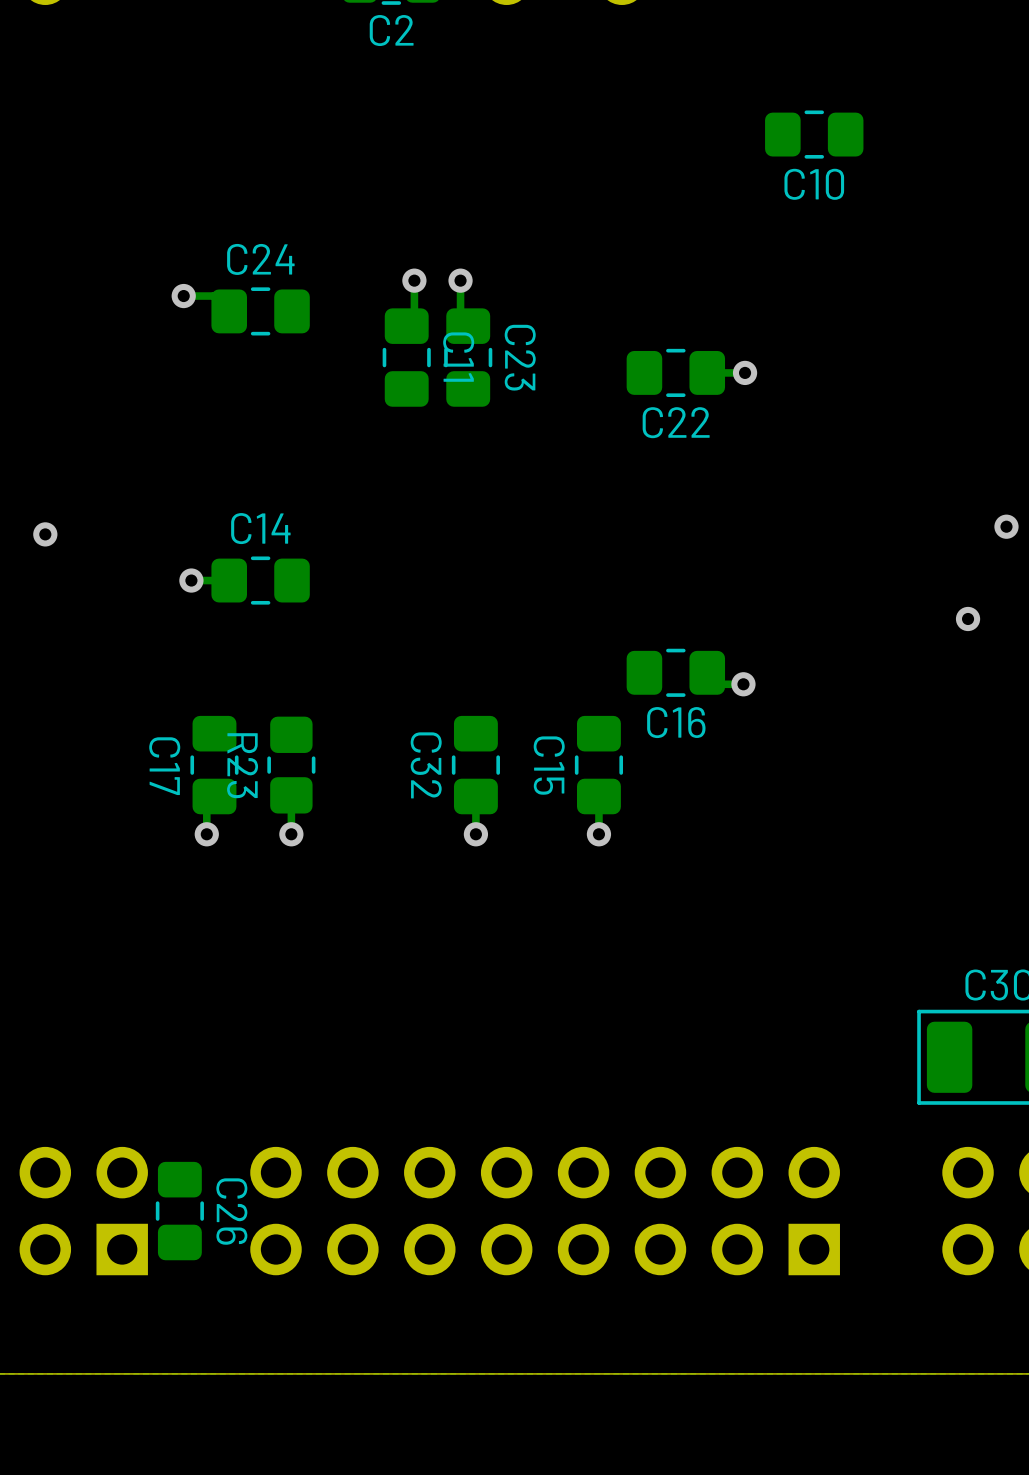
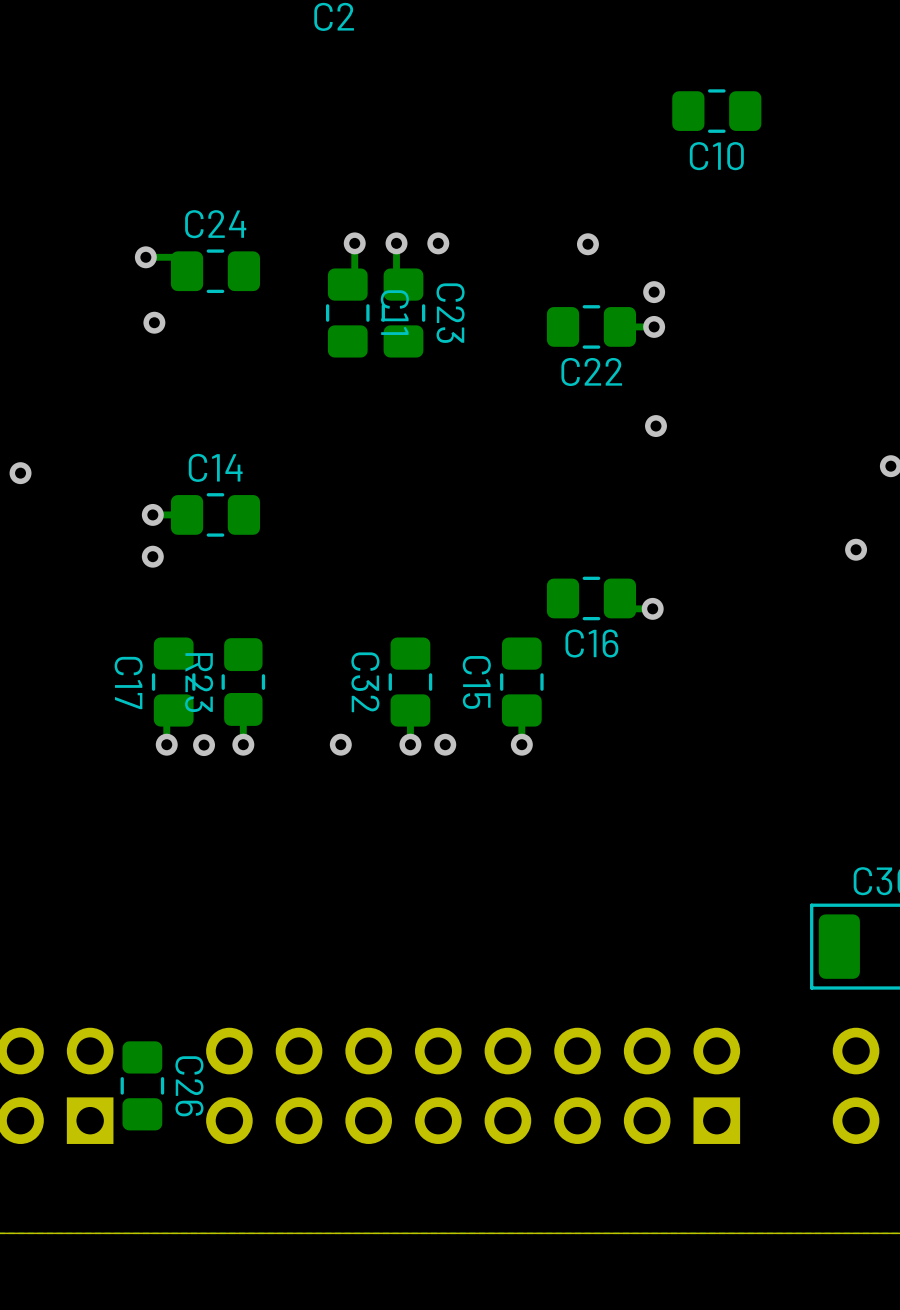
via: none -> (438, 243)
via: none -> (587, 244)
via: none -> (654, 292)
via: none -> (154, 322)
via: none -> (655, 426)
via: none -> (152, 556)
via: none -> (204, 745)
via: none -> (340, 744)
via: none -> (445, 744)

